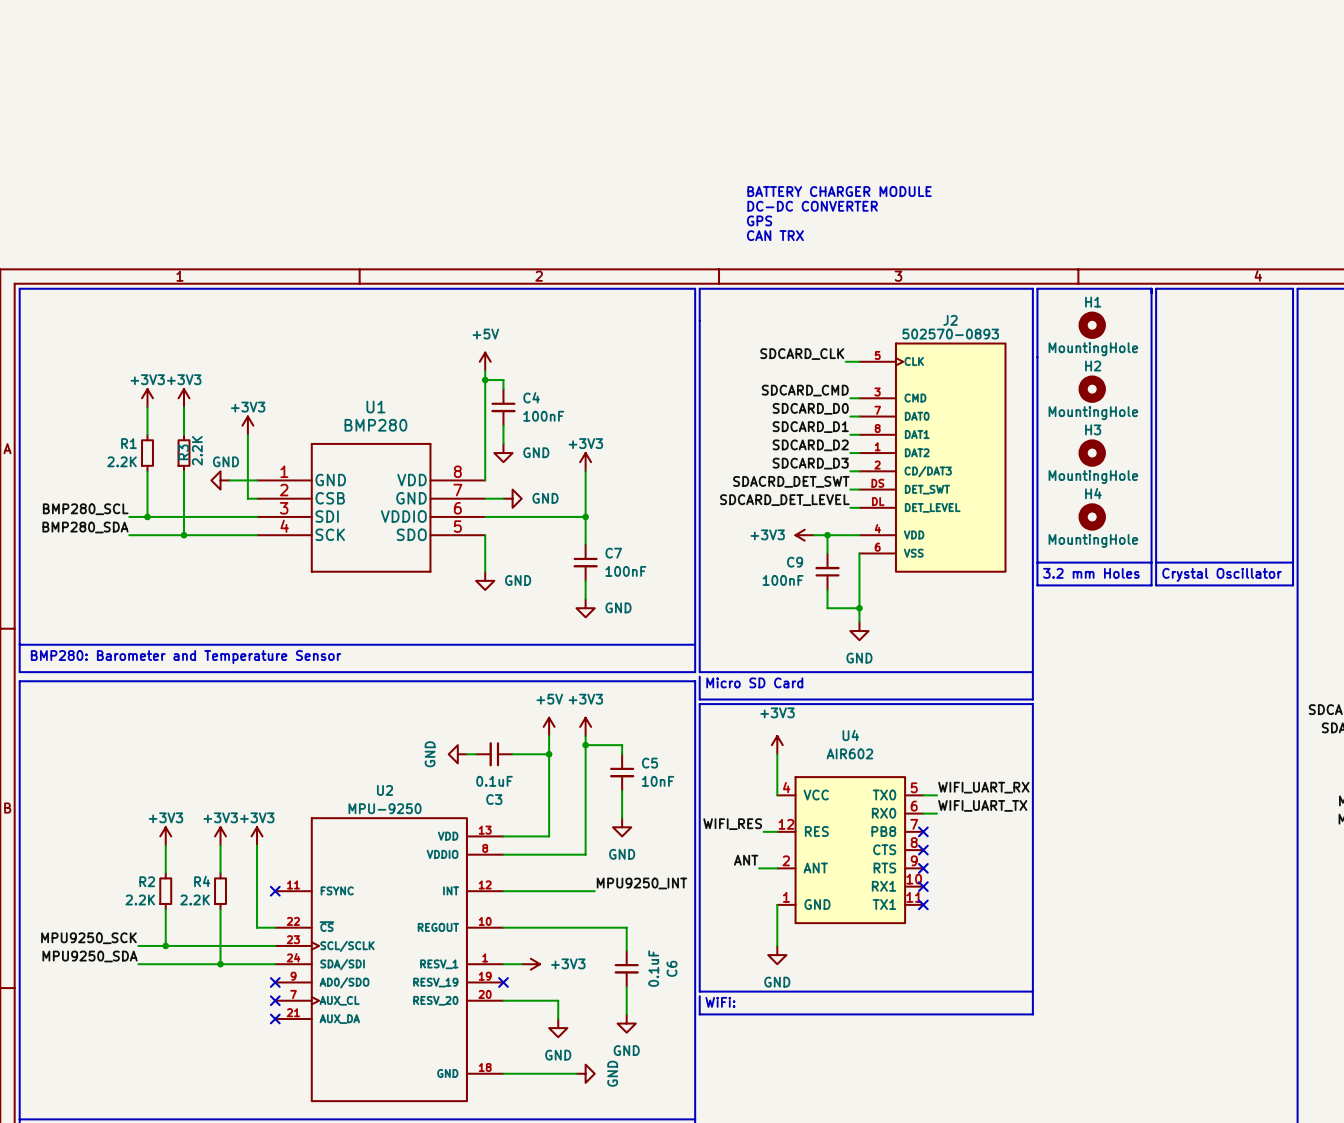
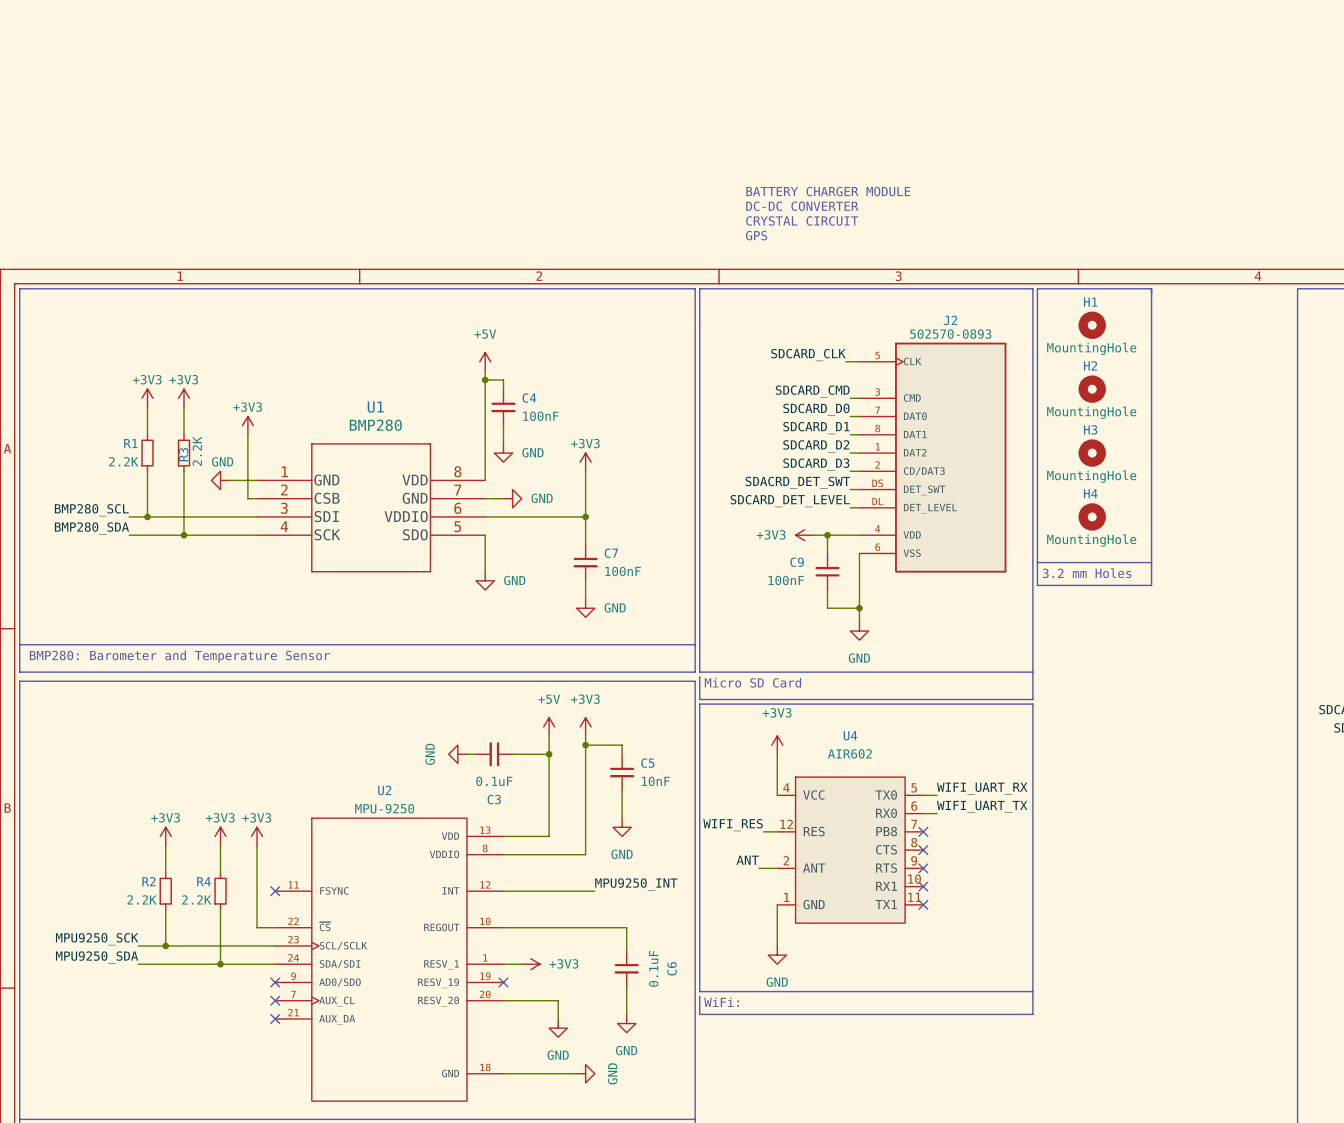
text: GPS (759, 220) -> CRYSTAL CIRCUIT (802, 220)
text: CAN TRX (775, 235) -> GPS (756, 235)
line: (1156, 288) (1156, 585) (1293, 585) (1293, 288) (1156, 288) -> none
line: (1156, 562) (1293, 562) -> none
text: Crystal Oscillator (1222, 574) -> none

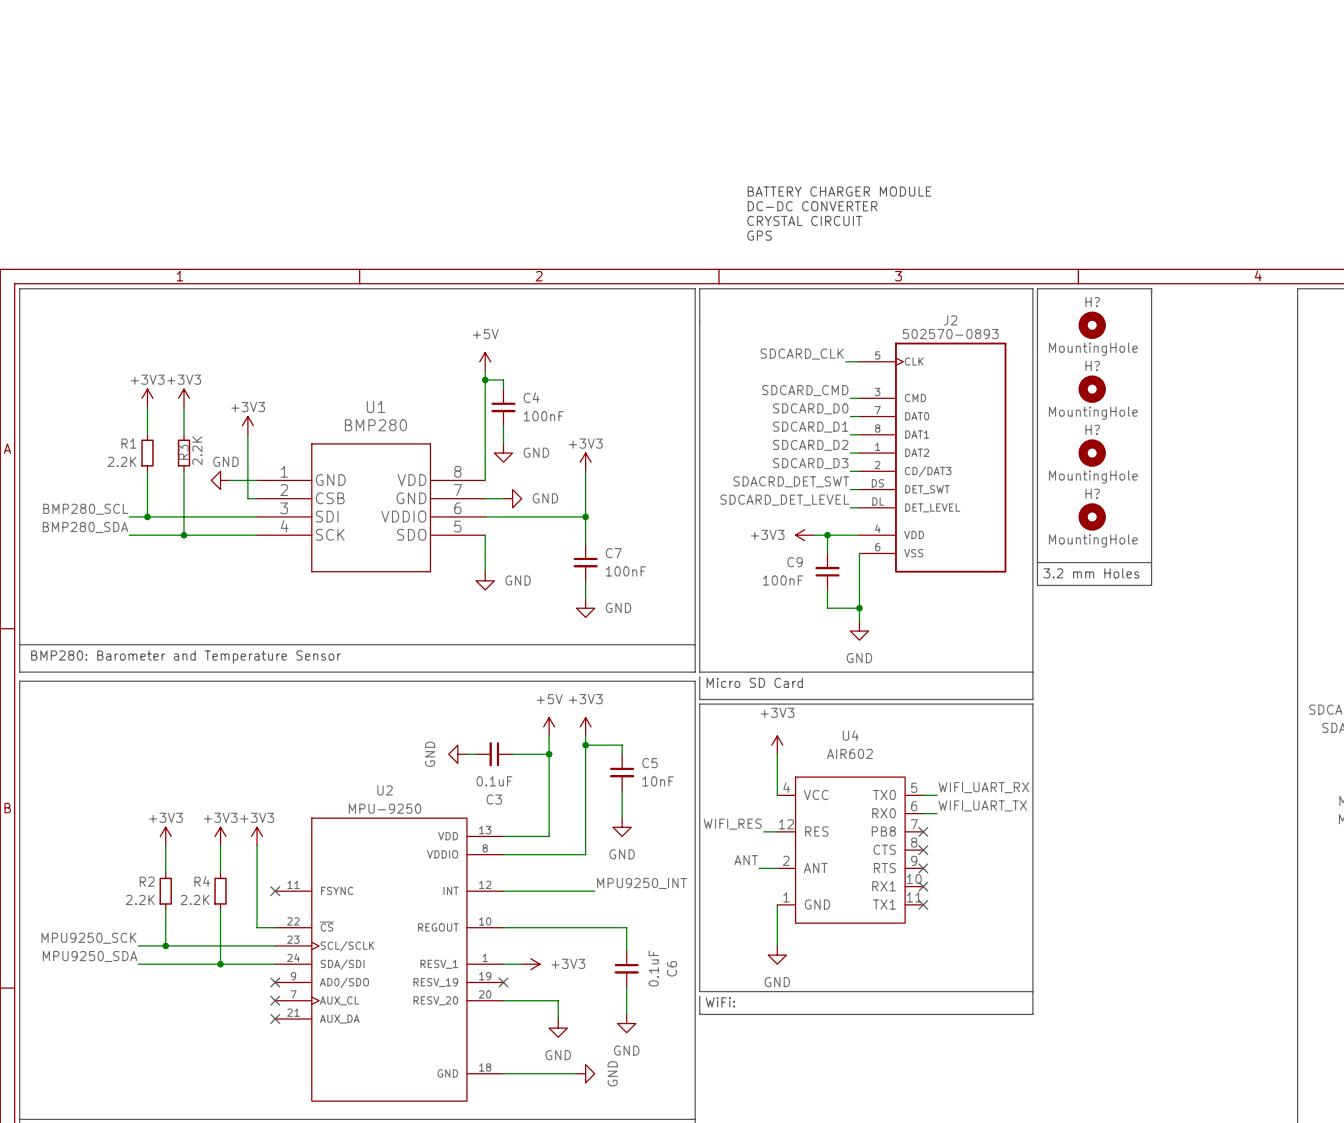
H1 name: H1 (1090, 302) -> H? (1092, 302)
H2 name: H2 (1090, 365) -> H? (1092, 366)
H3 name: H3 (1090, 429) -> H? (1092, 429)
H4 name: H4 (1090, 493) -> H? (1092, 493)

